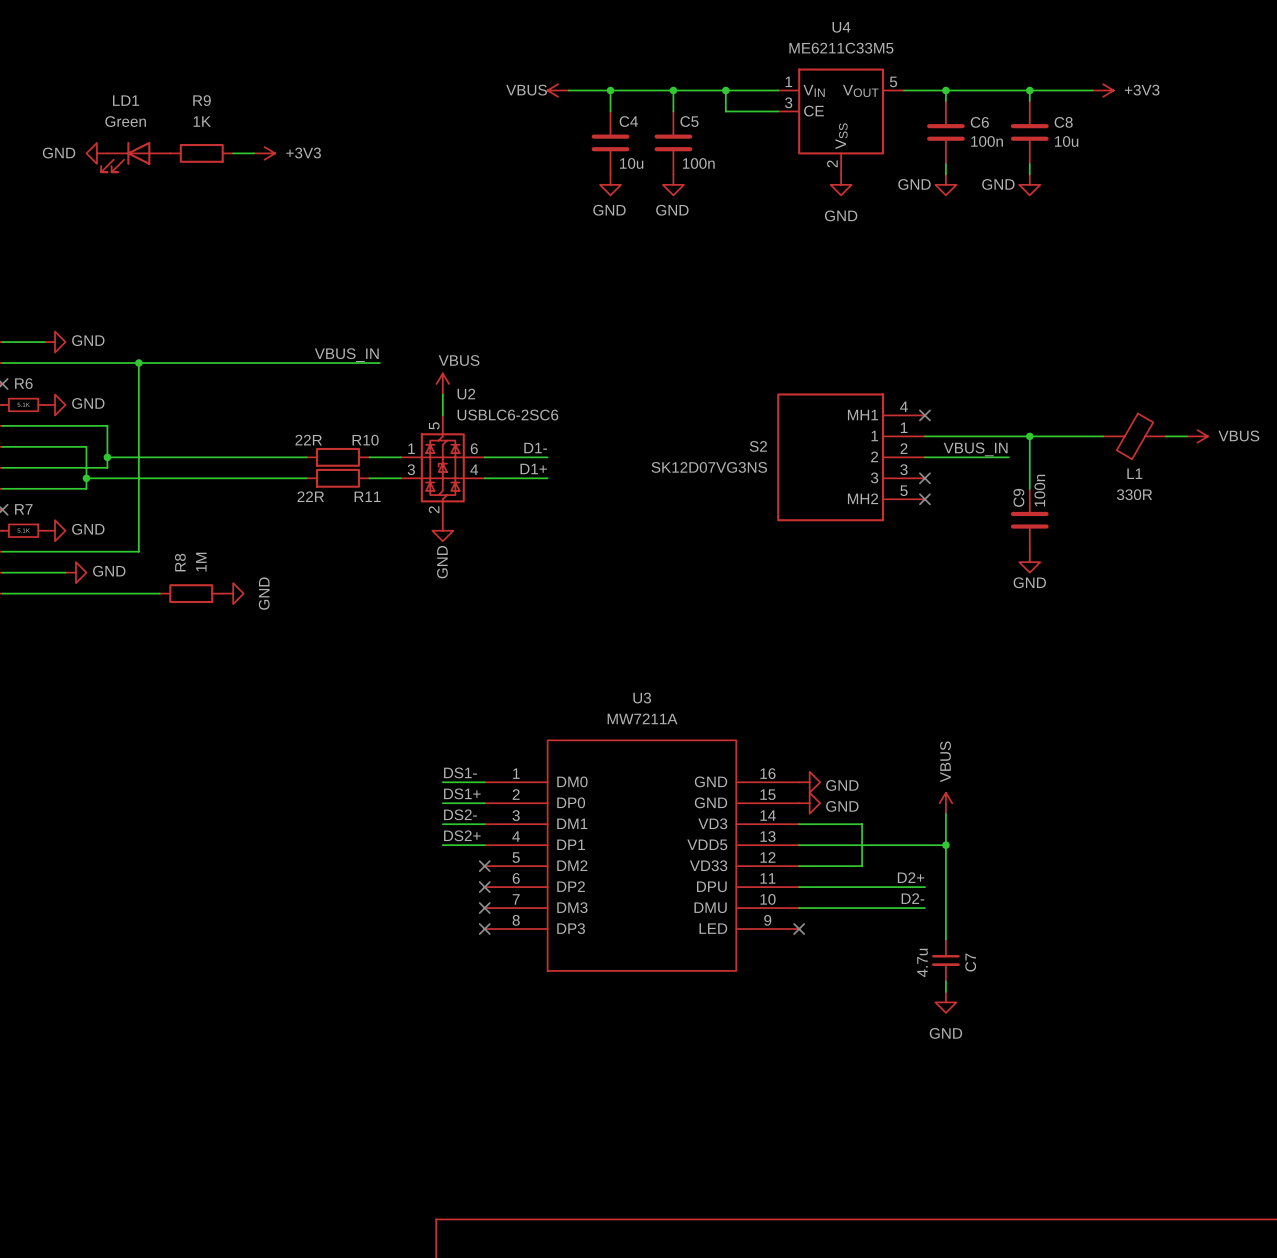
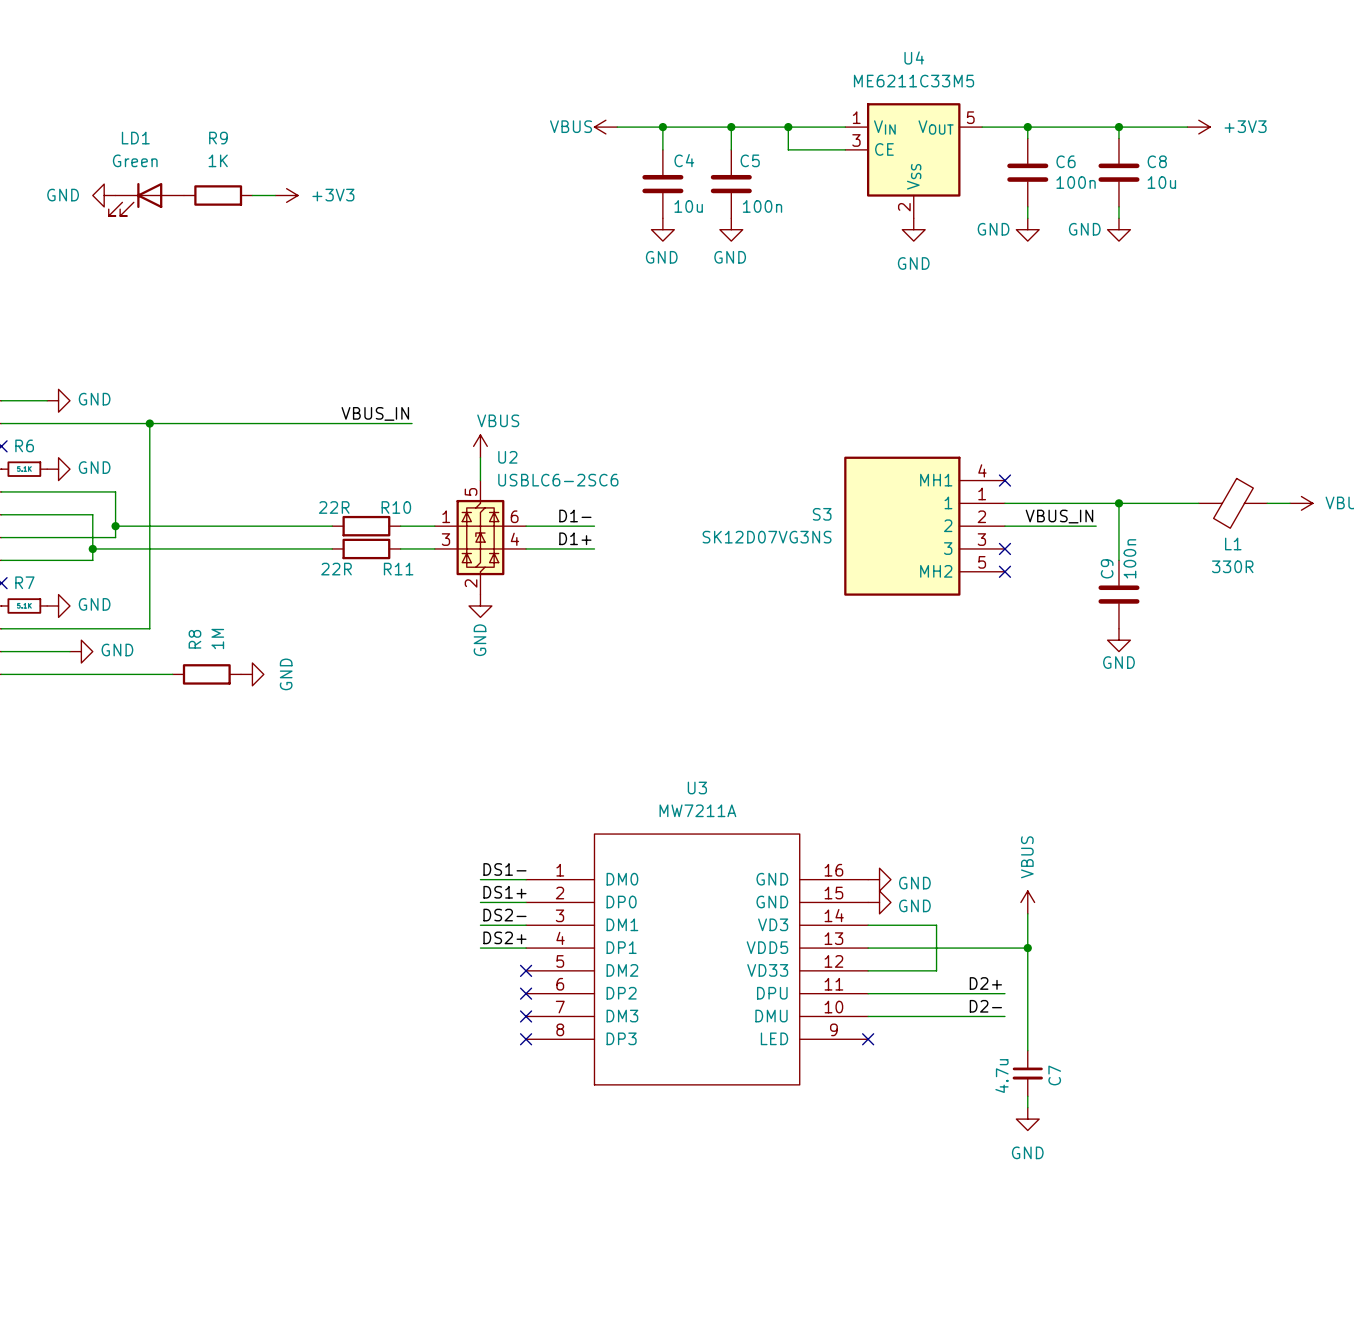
S2 name: S2 (758, 446) -> S3 (822, 514)

